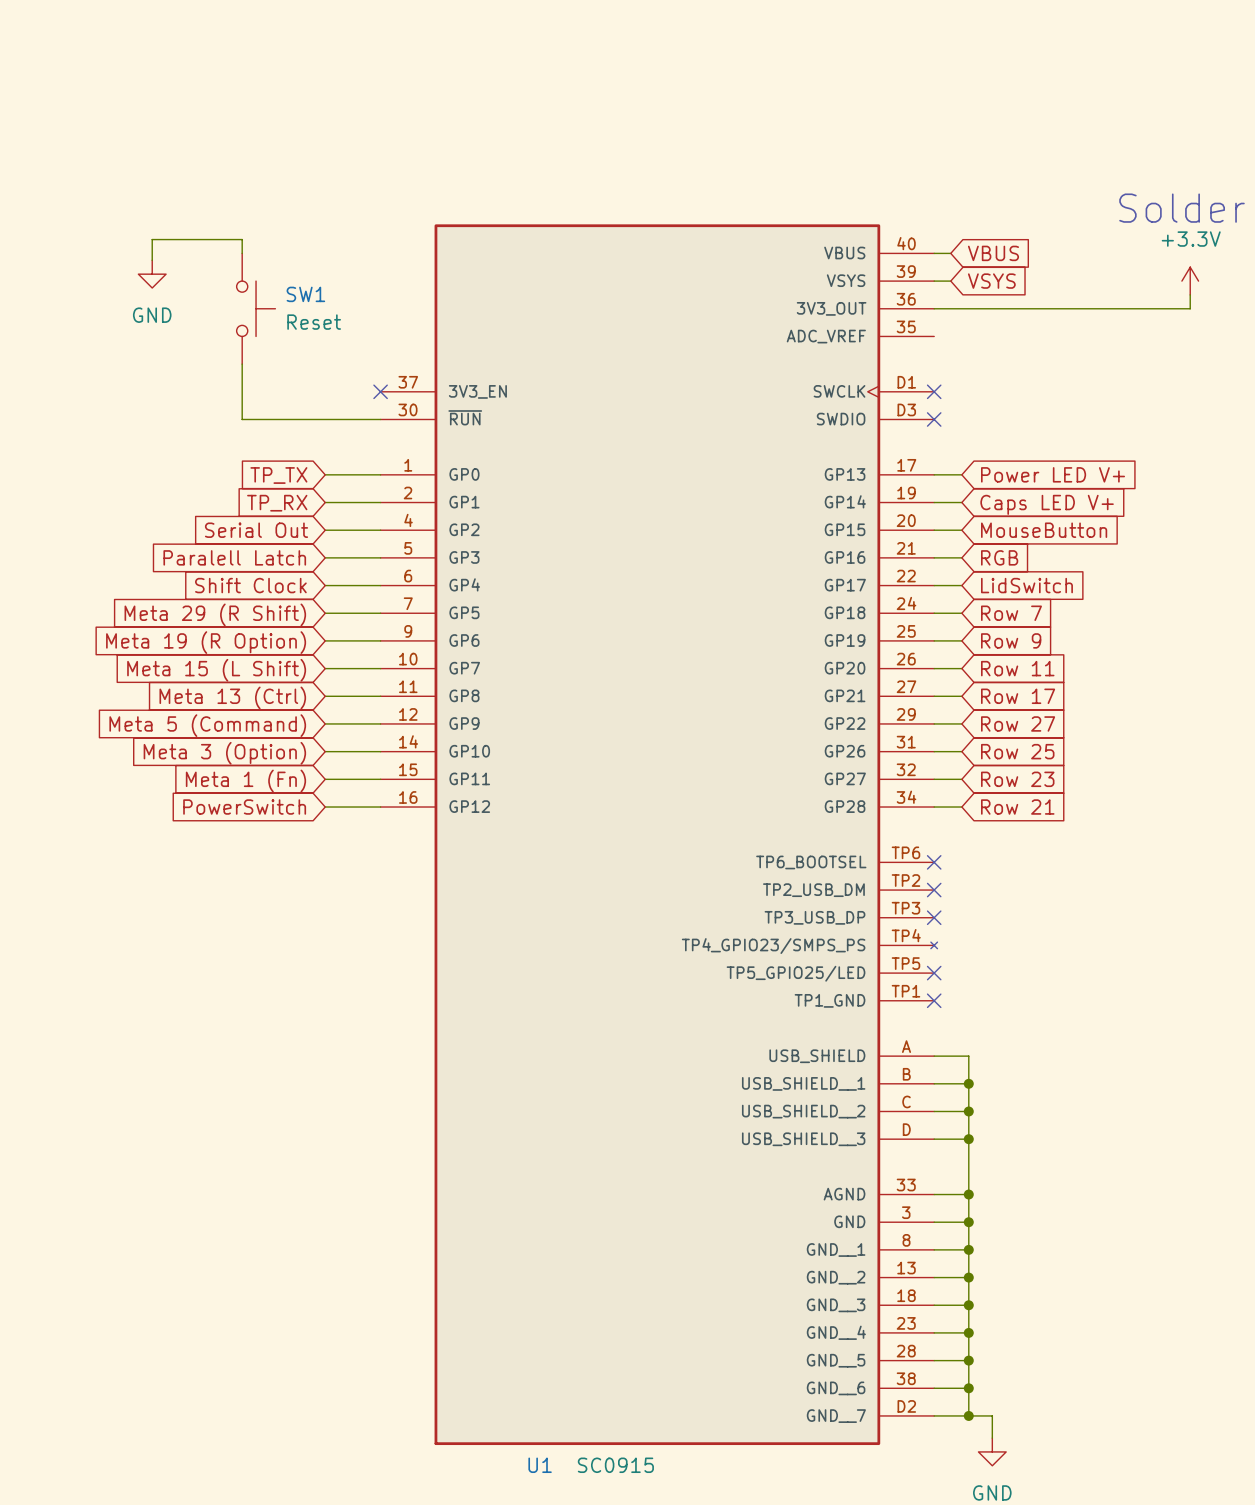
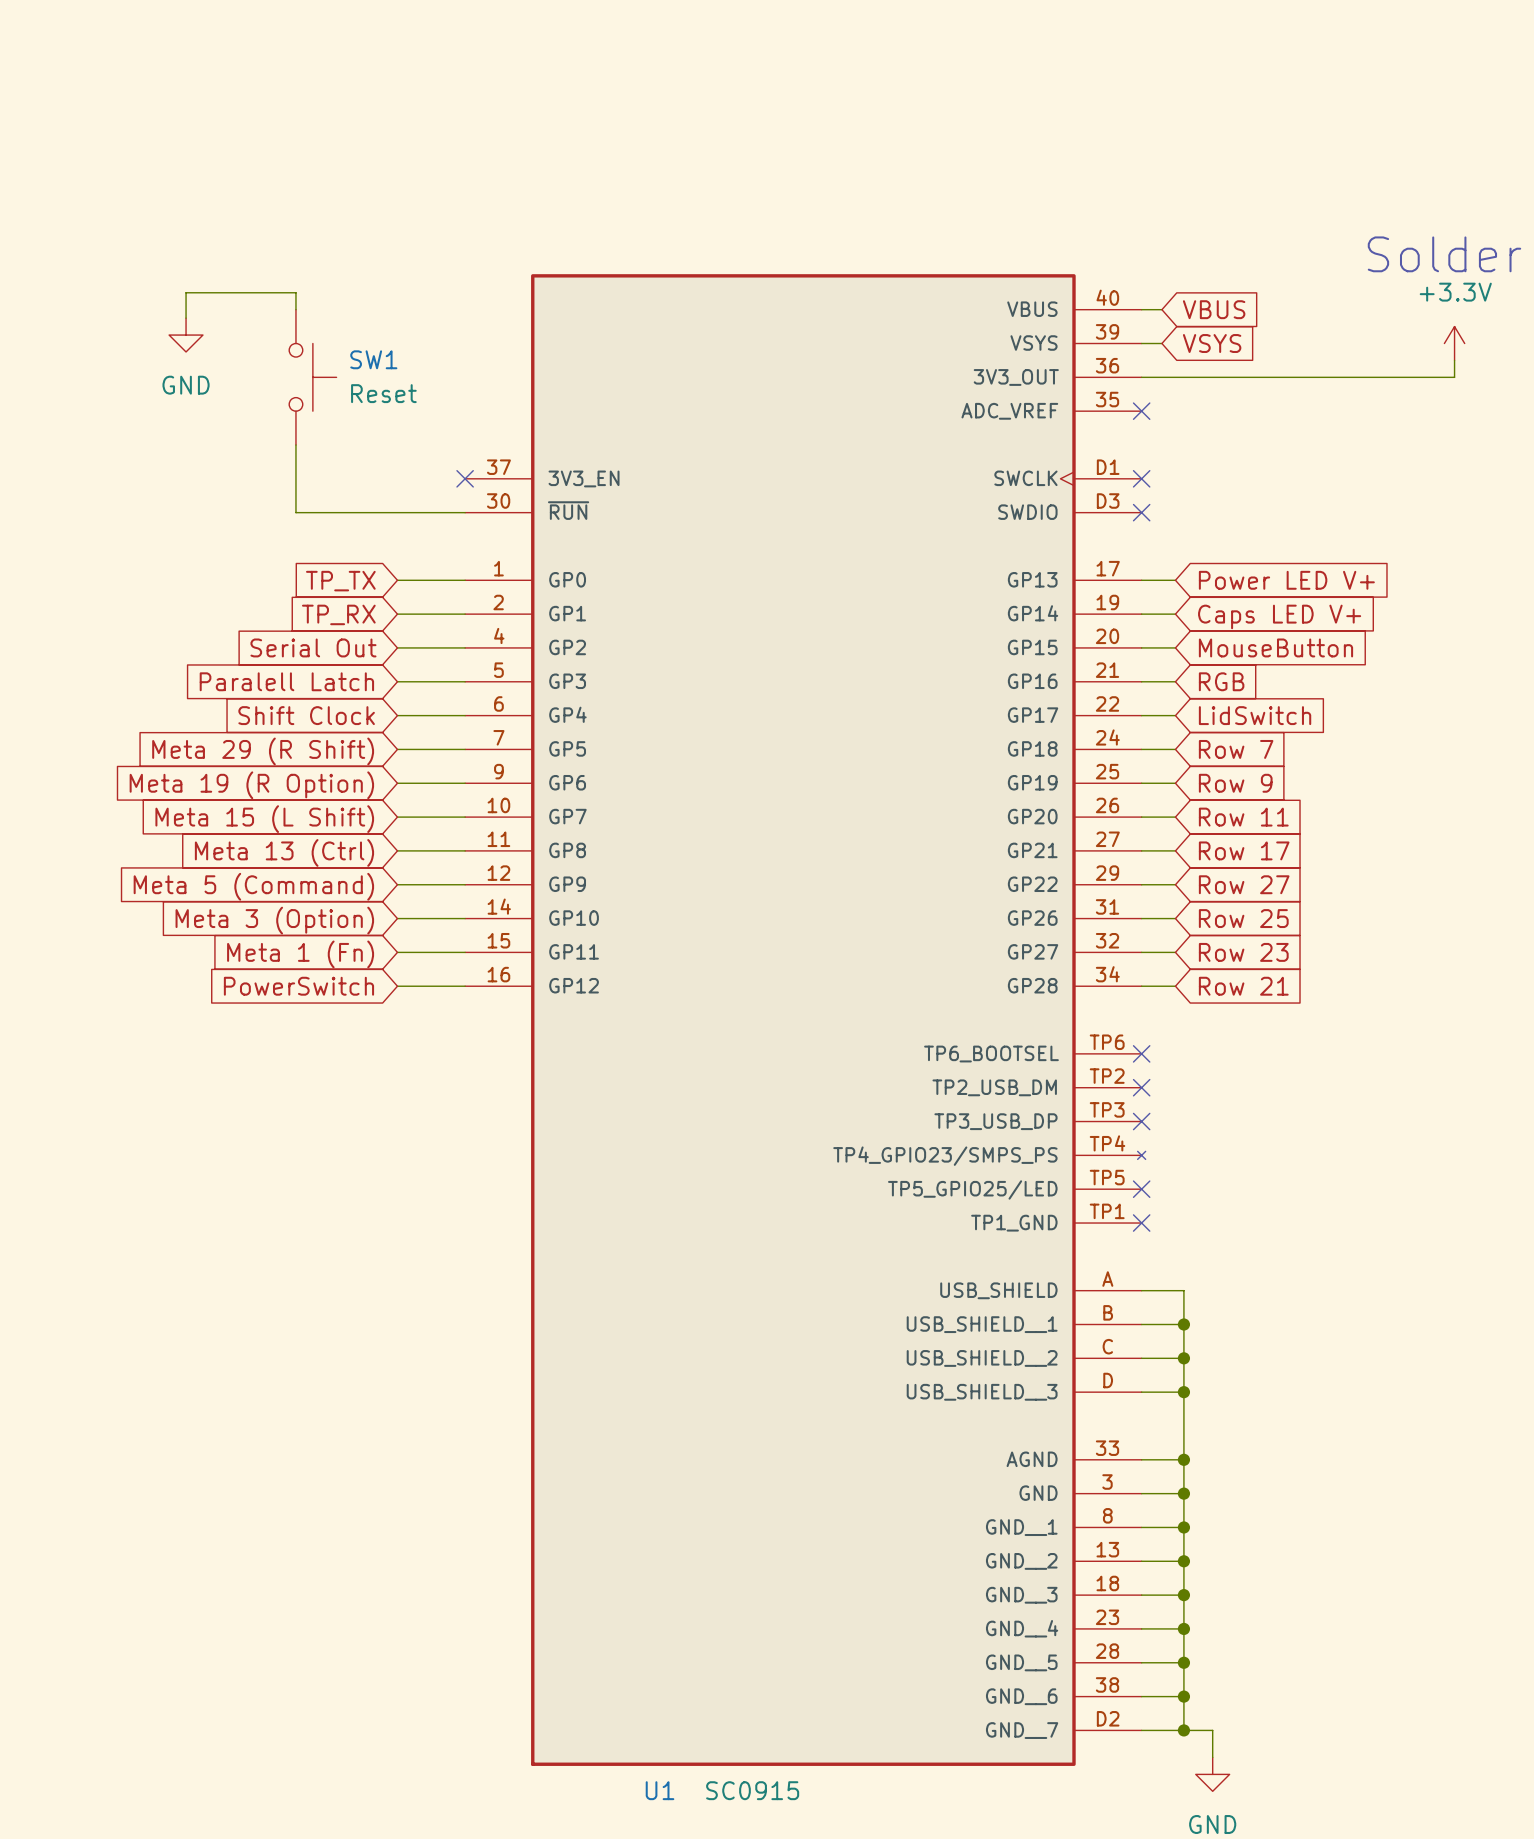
no-connect mark: none -> (1141, 411)

